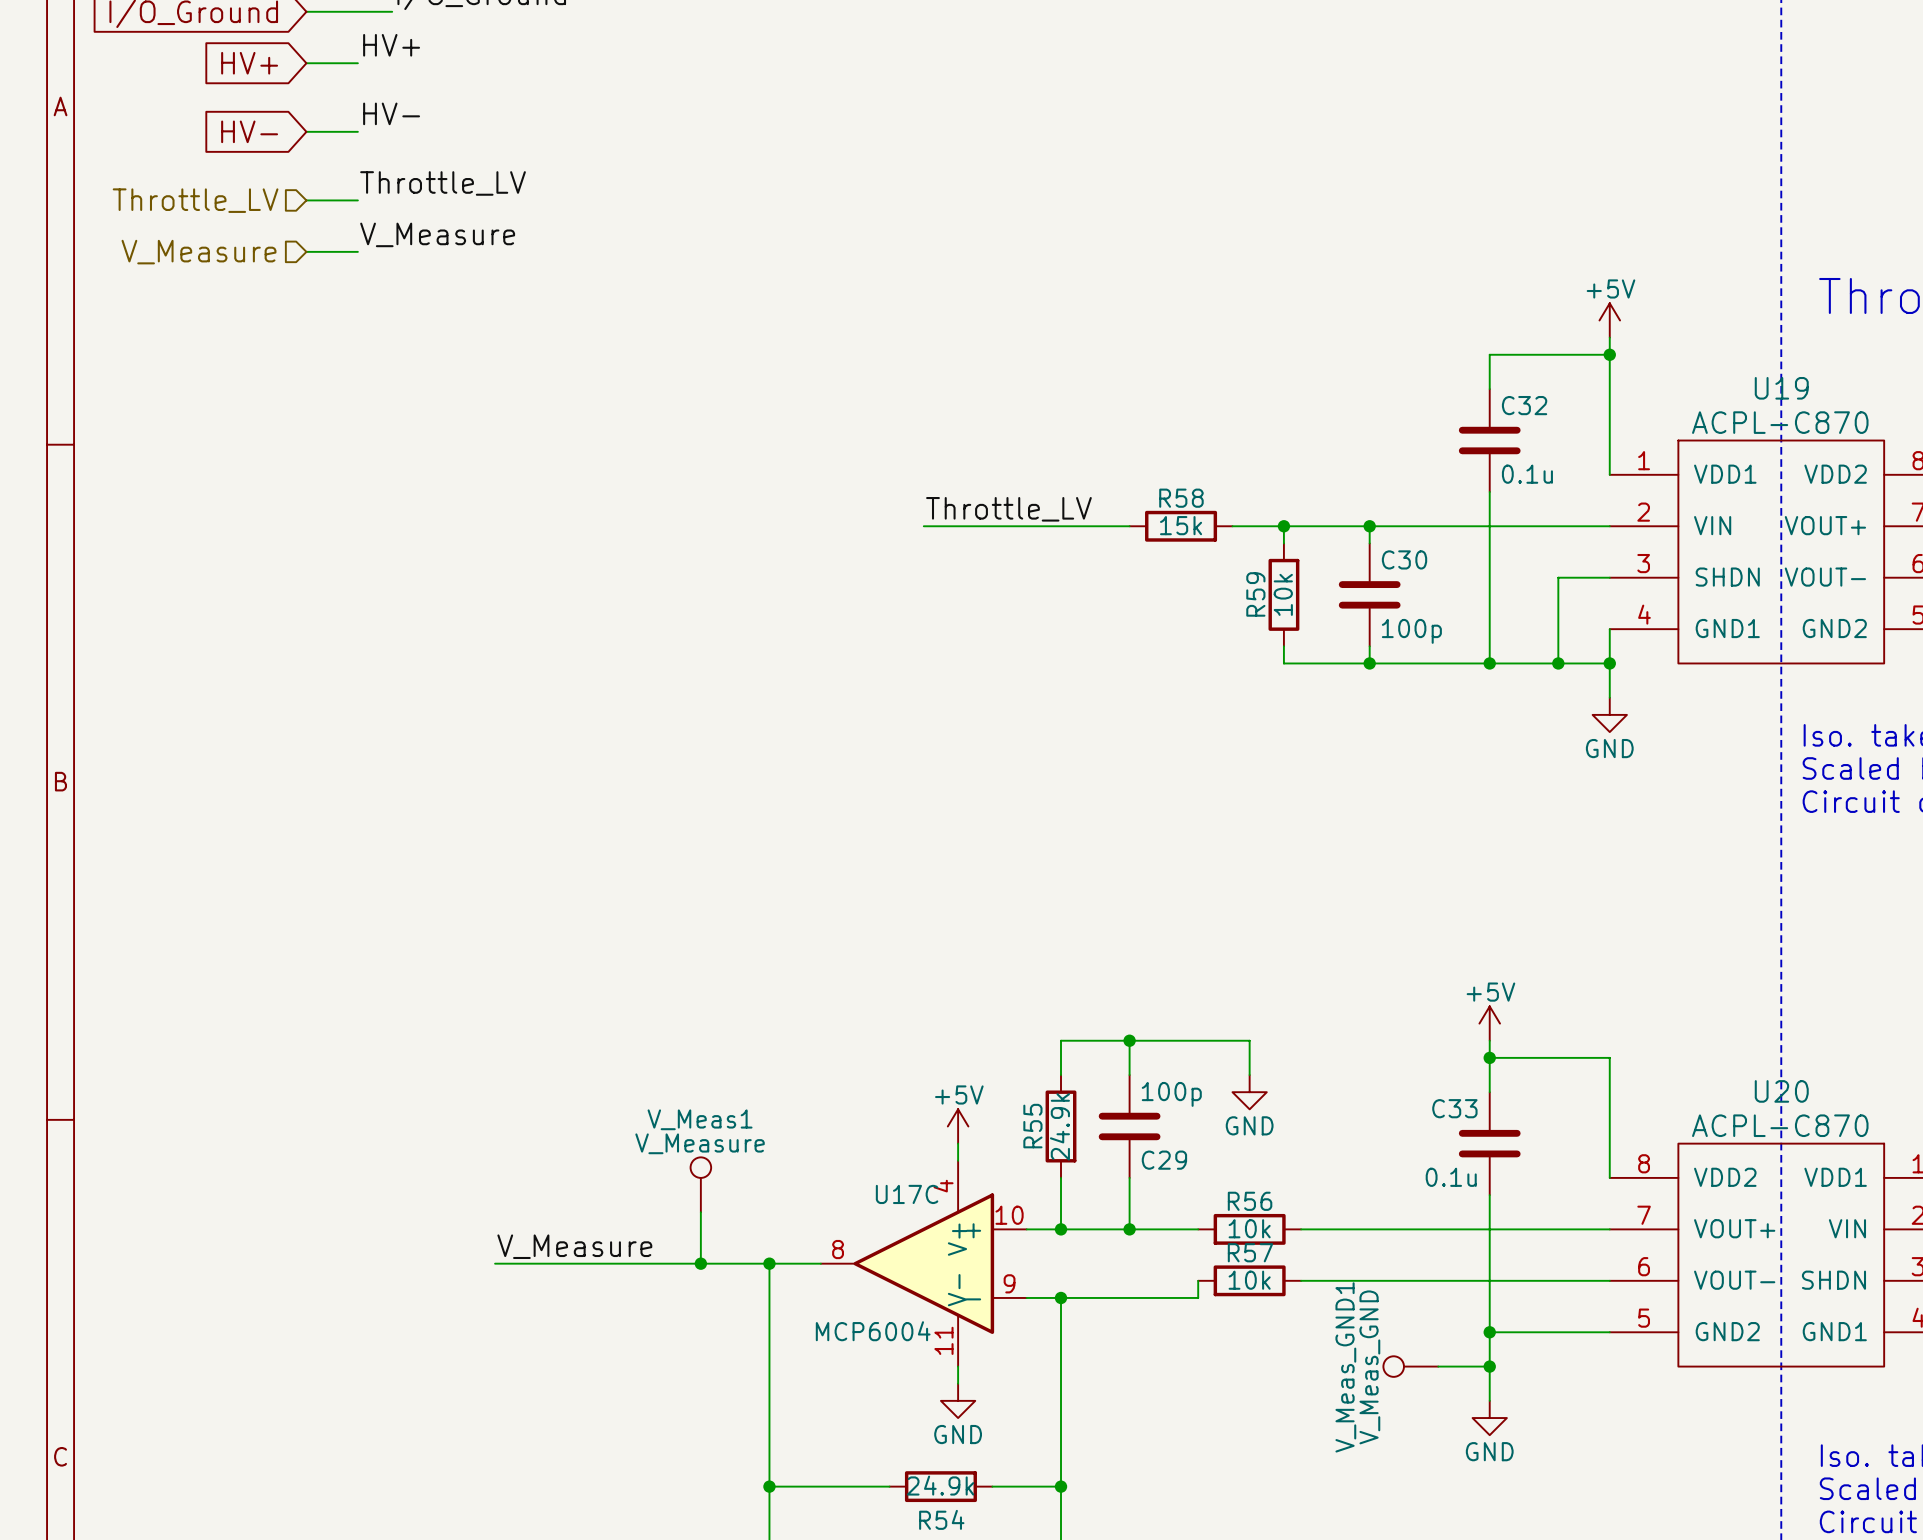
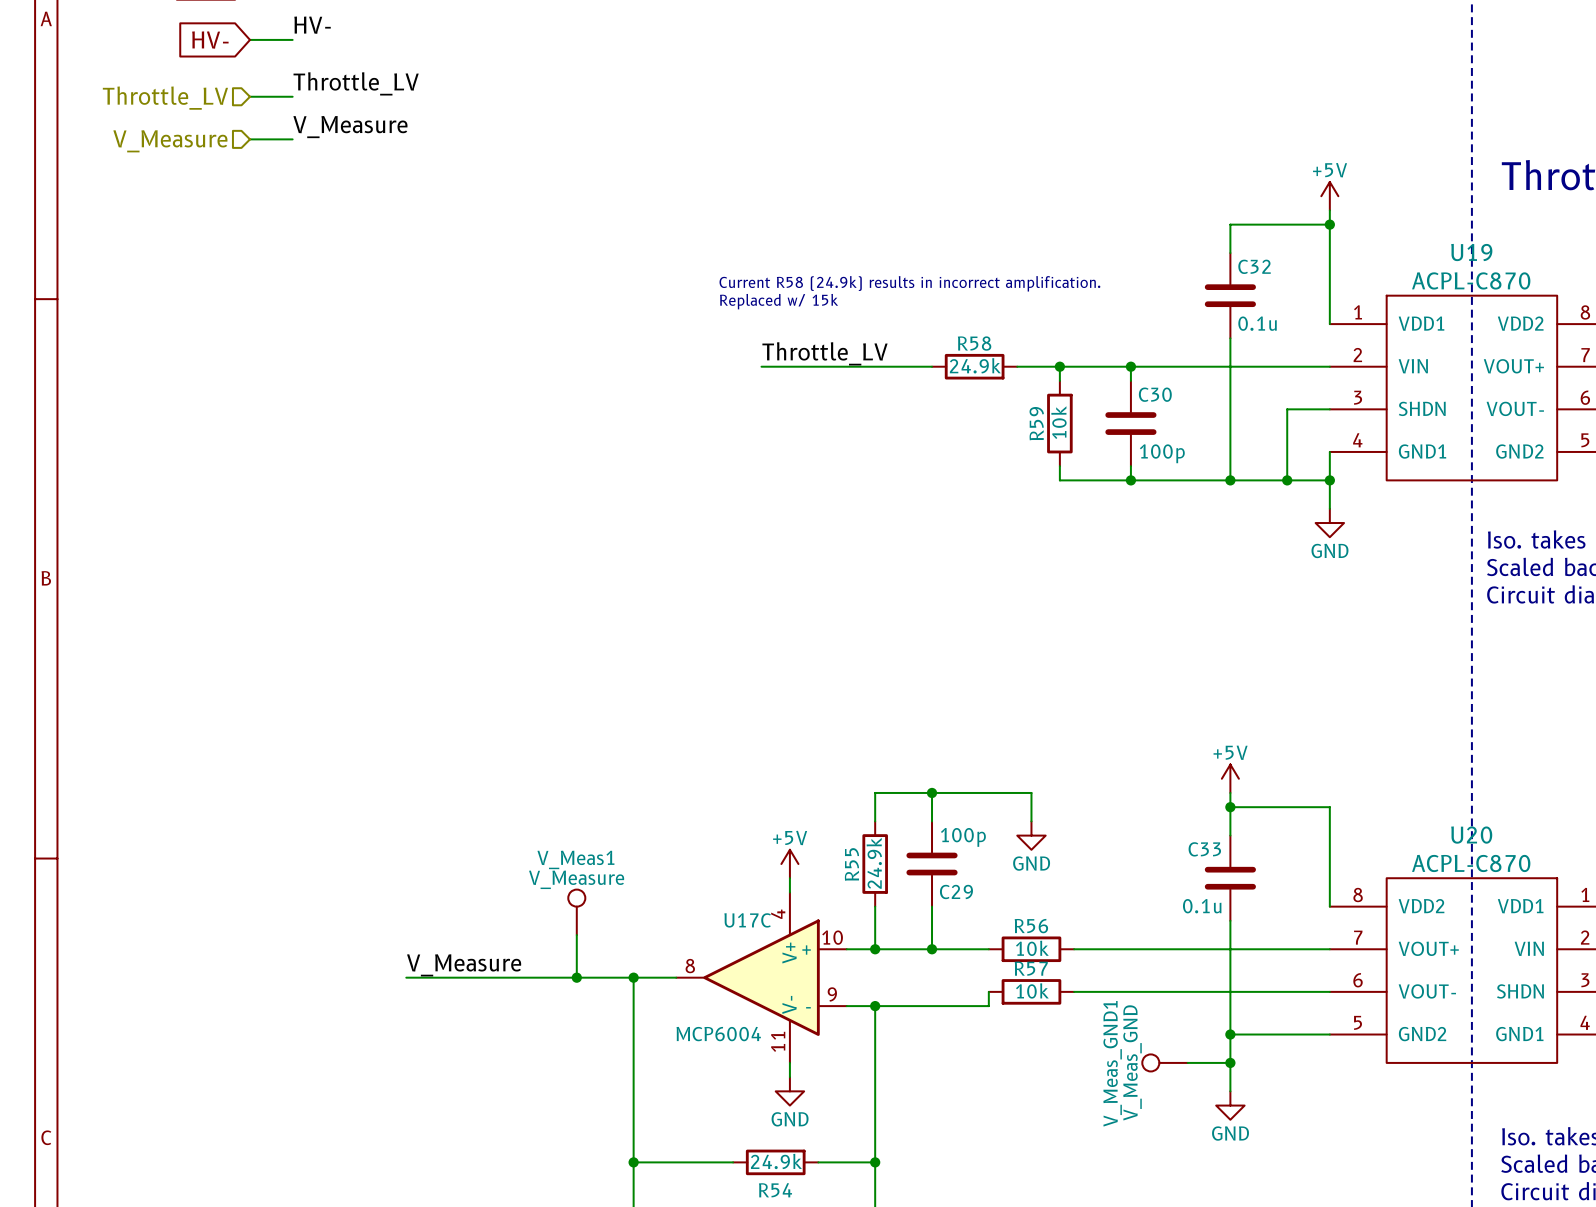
text: none -> Current R58 (24.9k) results in incorrect amplification. (909, 283)
text: none -> Replaced w/ 15k (779, 301)
R58 value: 15k (1181, 525) -> 24.9k (975, 365)

